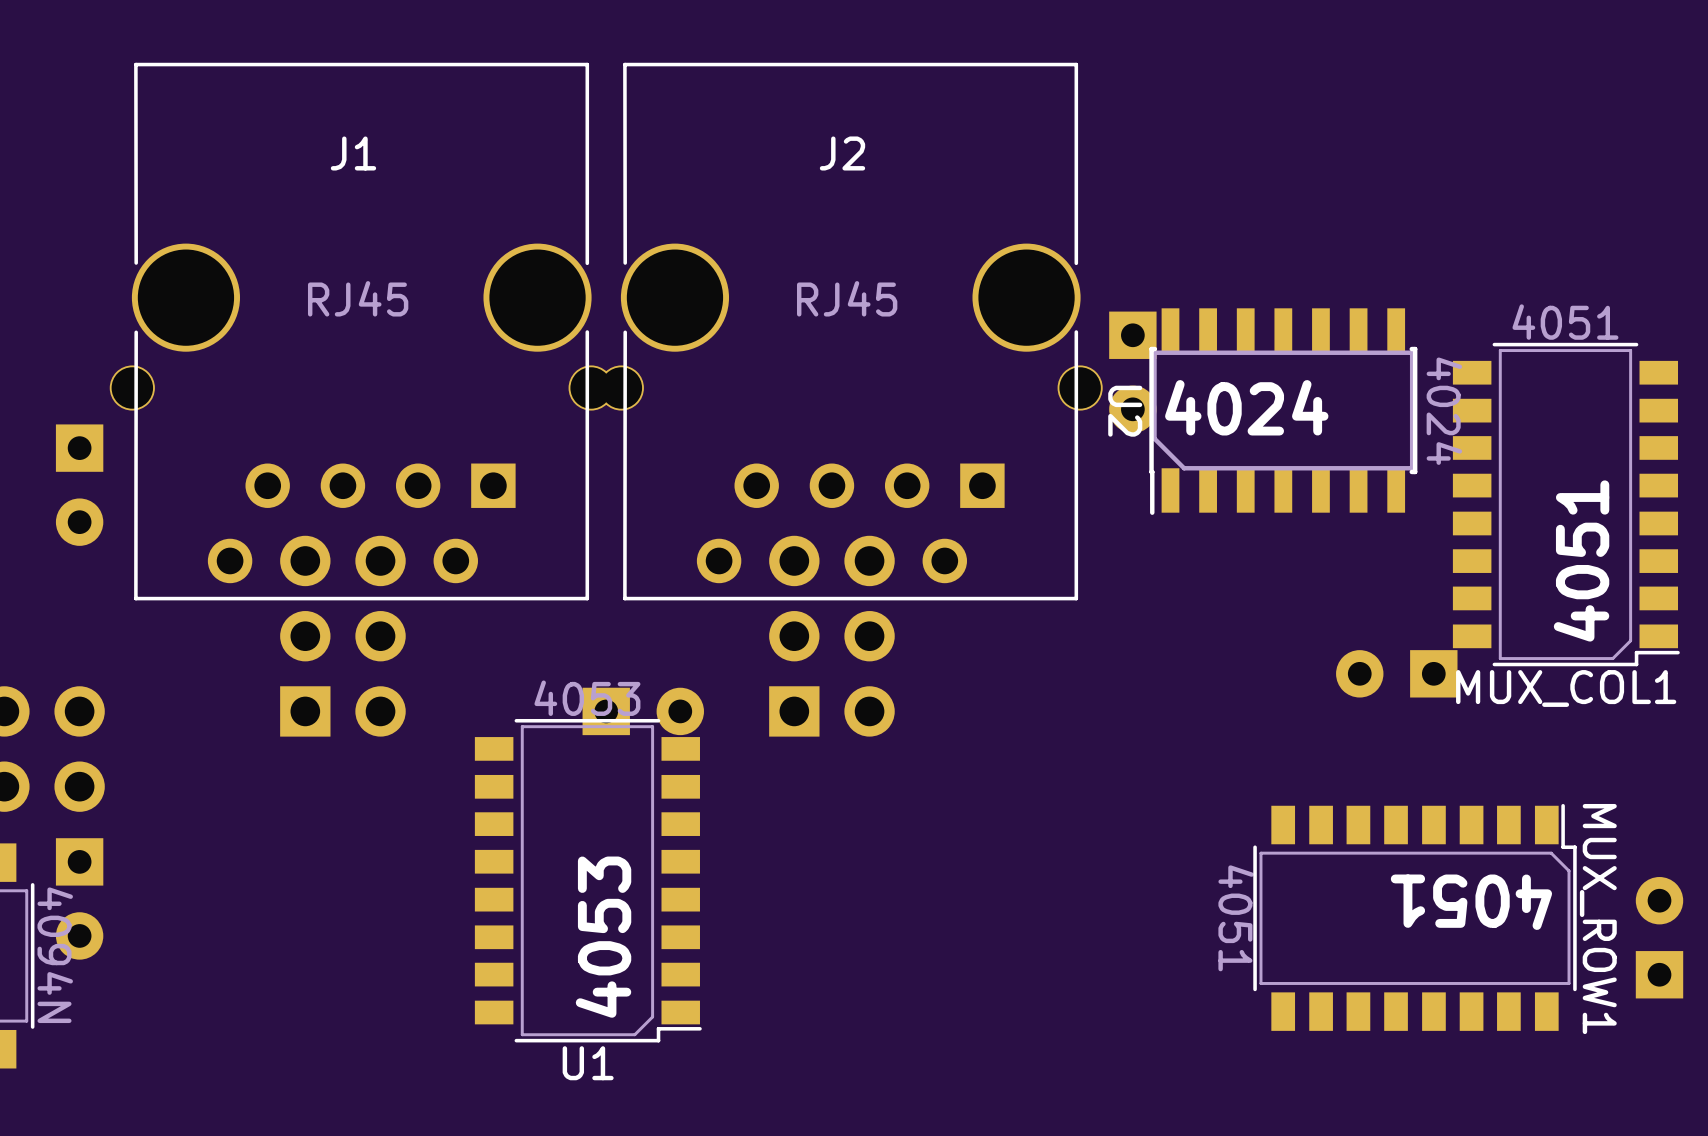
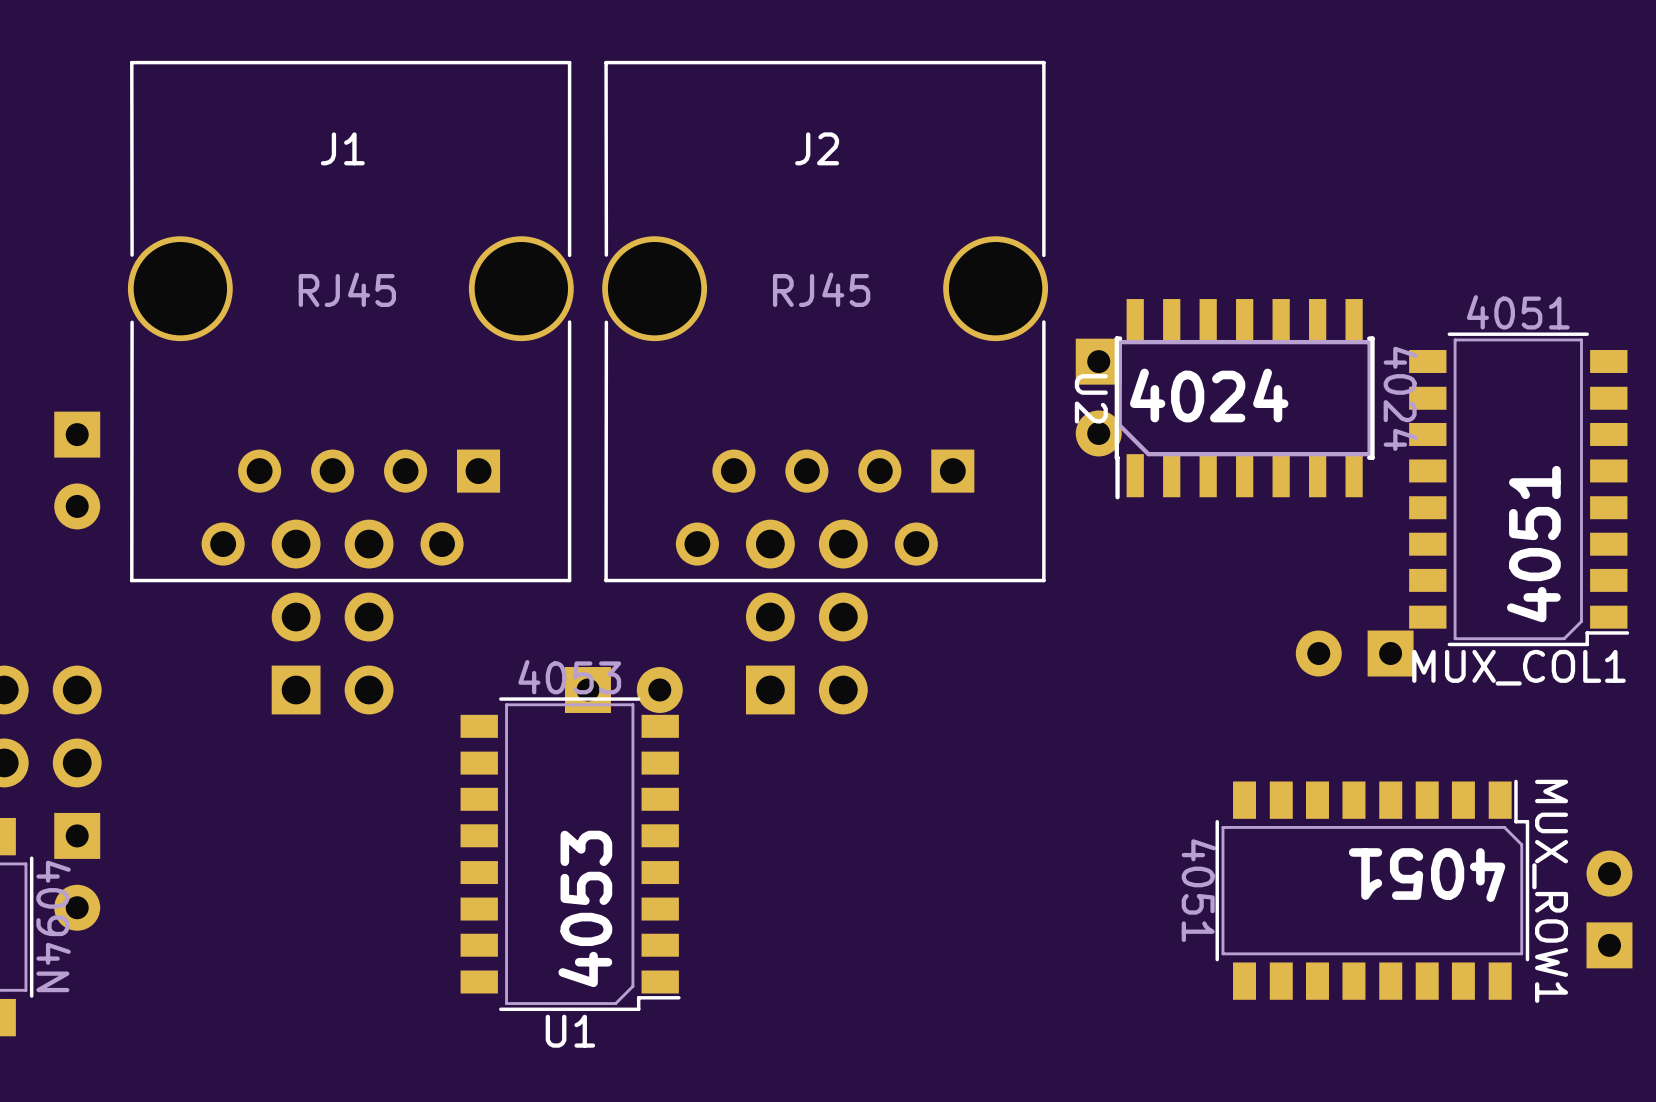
J1 footprint: [109, 62, 614, 601] -> [127, 60, 574, 583]
J2 footprint: [598, 62, 1103, 601] -> [602, 60, 1049, 583]
part position: (1132, 372) -> (1098, 397)

